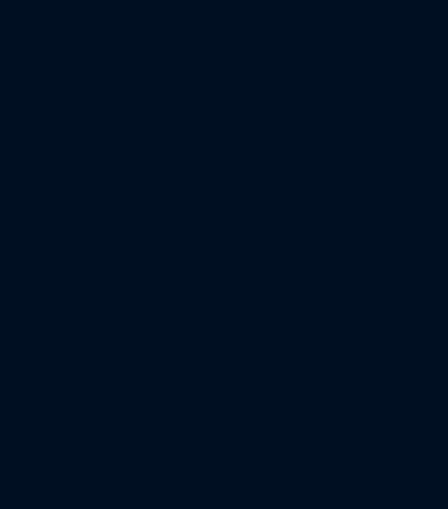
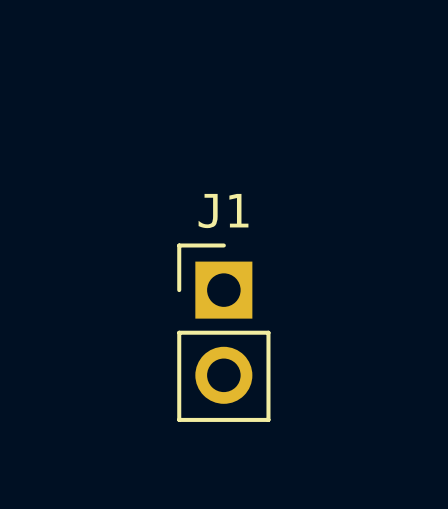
J1: none -> (223, 332)

